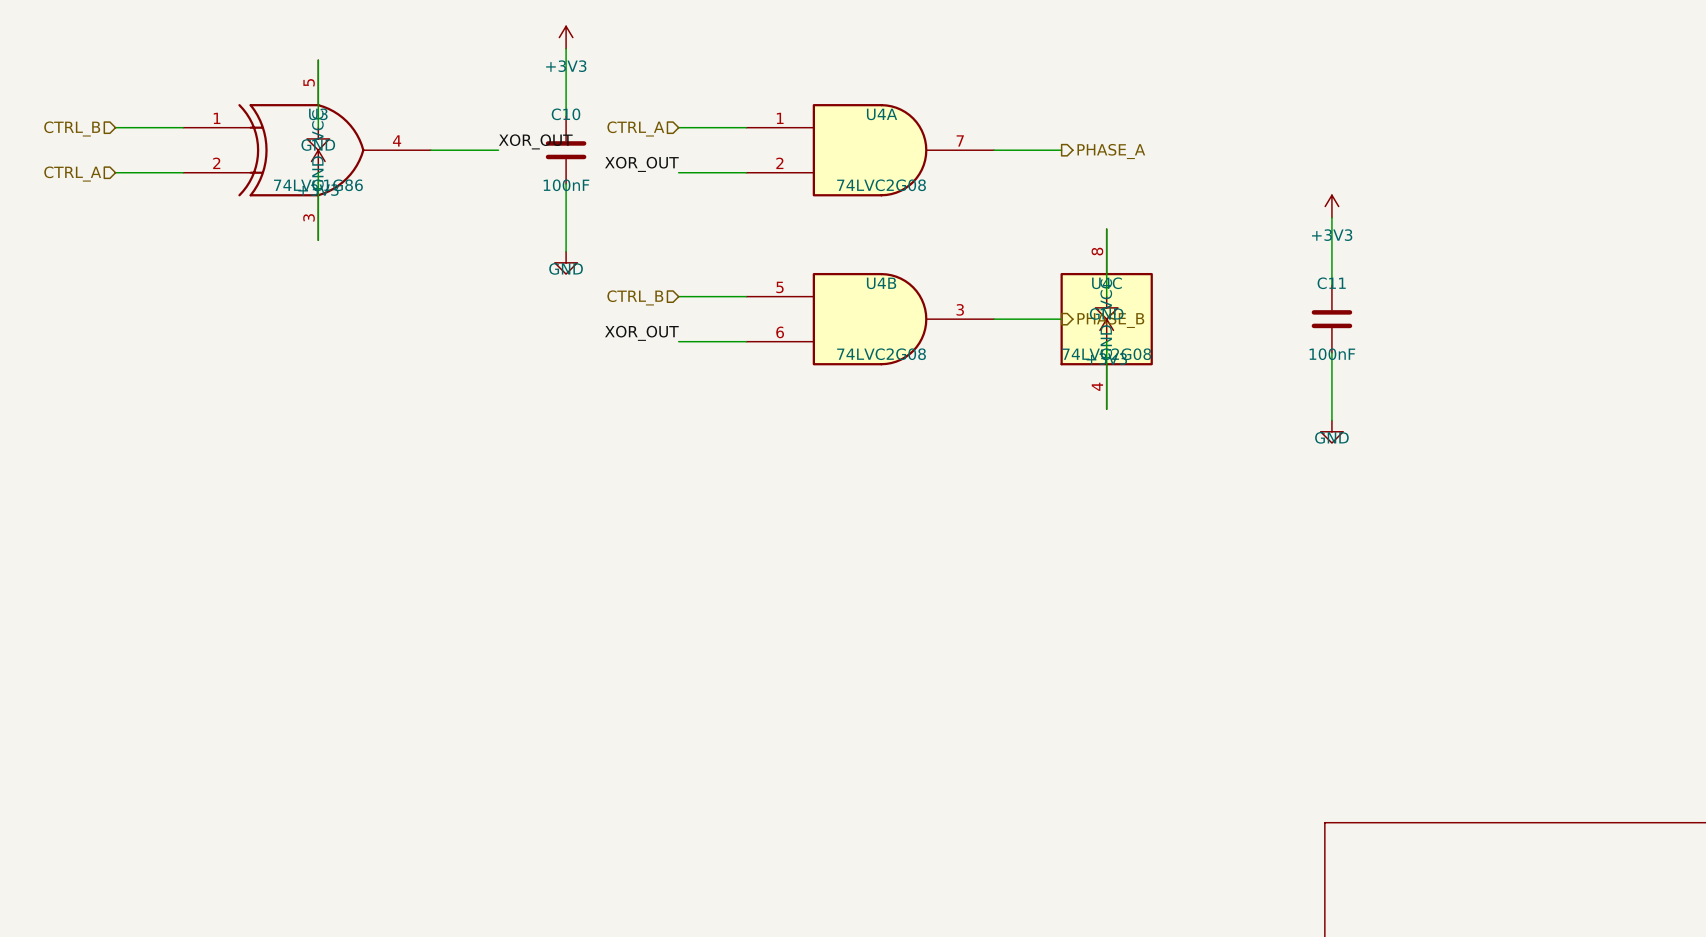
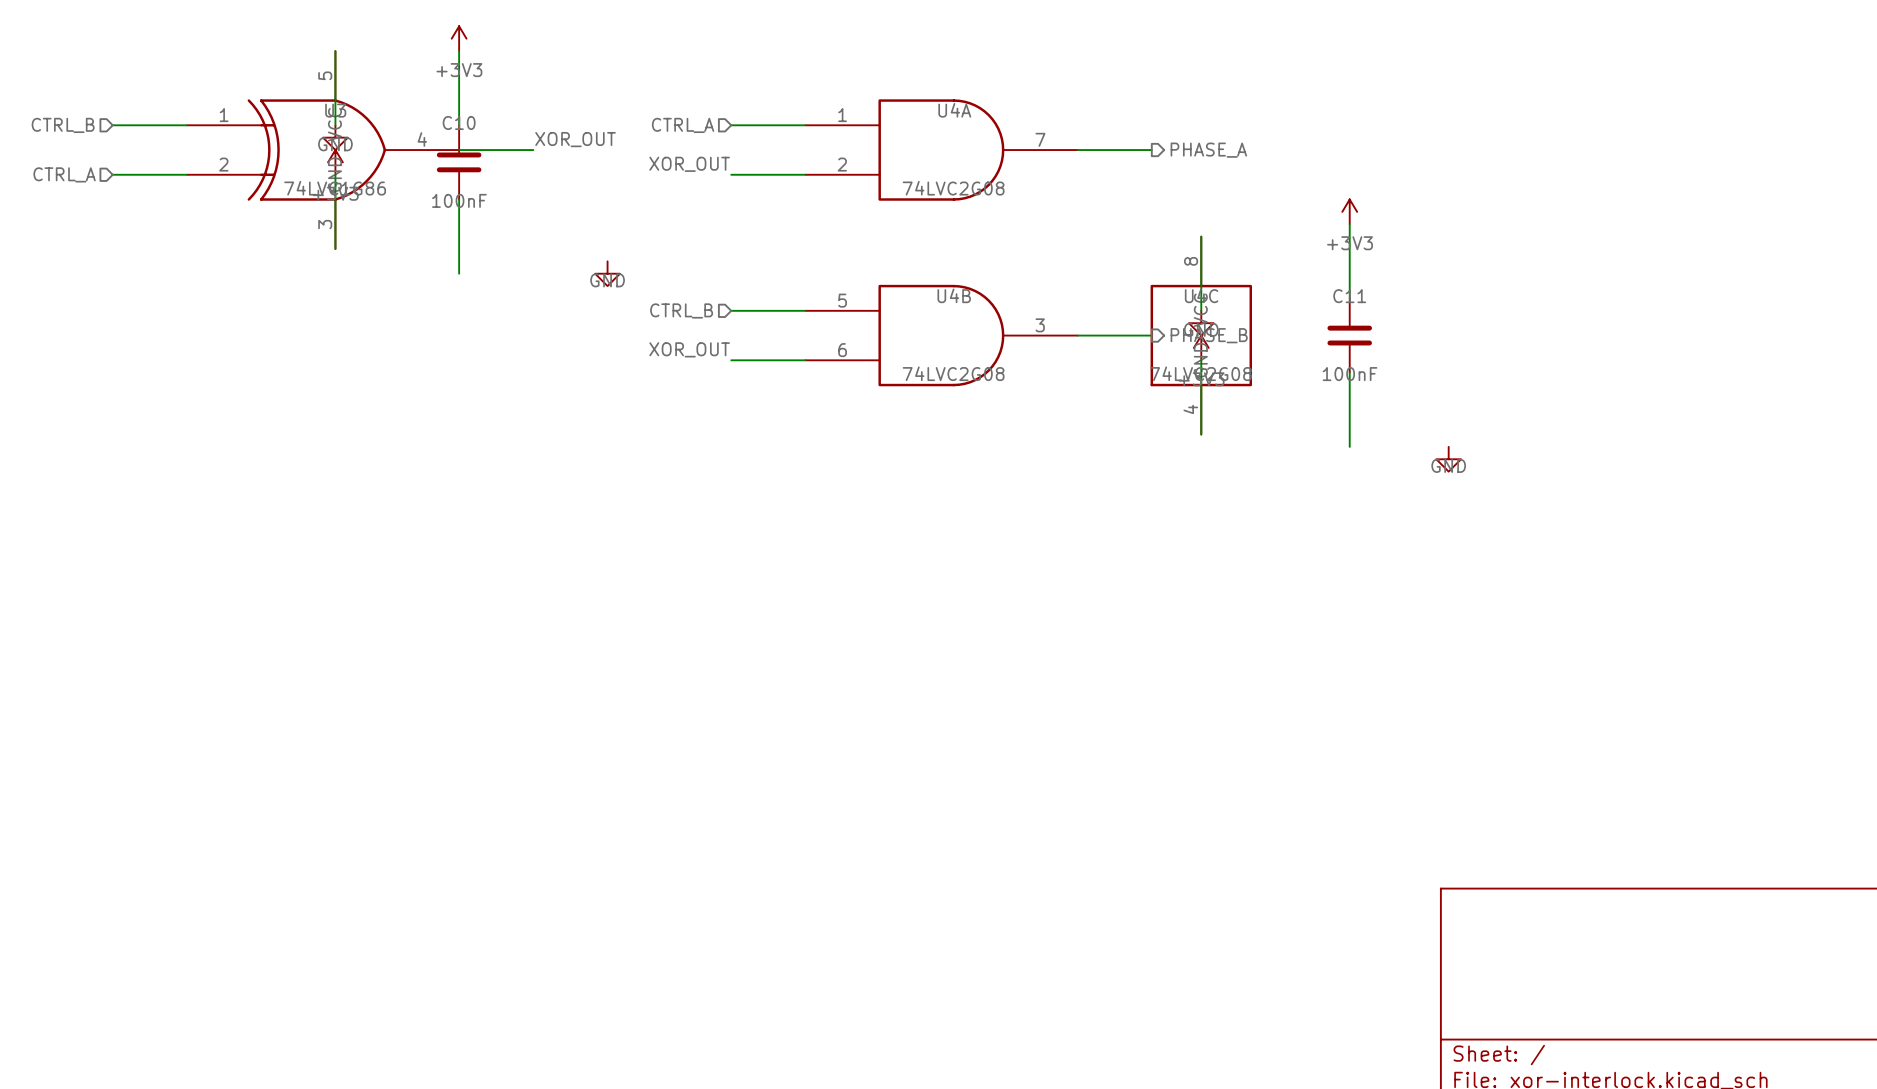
power symbol position: +3V3 (566, 37) -> +3V3 (459, 38)
wire: (566, 48) (566, 116) -> (459, 51) (459, 125)
C10 position: (566, 150) -> (459, 162)
wire: (566, 184) (566, 251) -> (459, 199) (459, 273)
power symbol position: +3V3 (1331, 206) -> +3V3 (1349, 211)
wire: (1331, 217) (1331, 285) -> (1349, 224) (1349, 298)
C11 position: (1331, 319) -> (1349, 335)
wire: (1331, 352) (1331, 420) -> (1349, 372) (1349, 446)

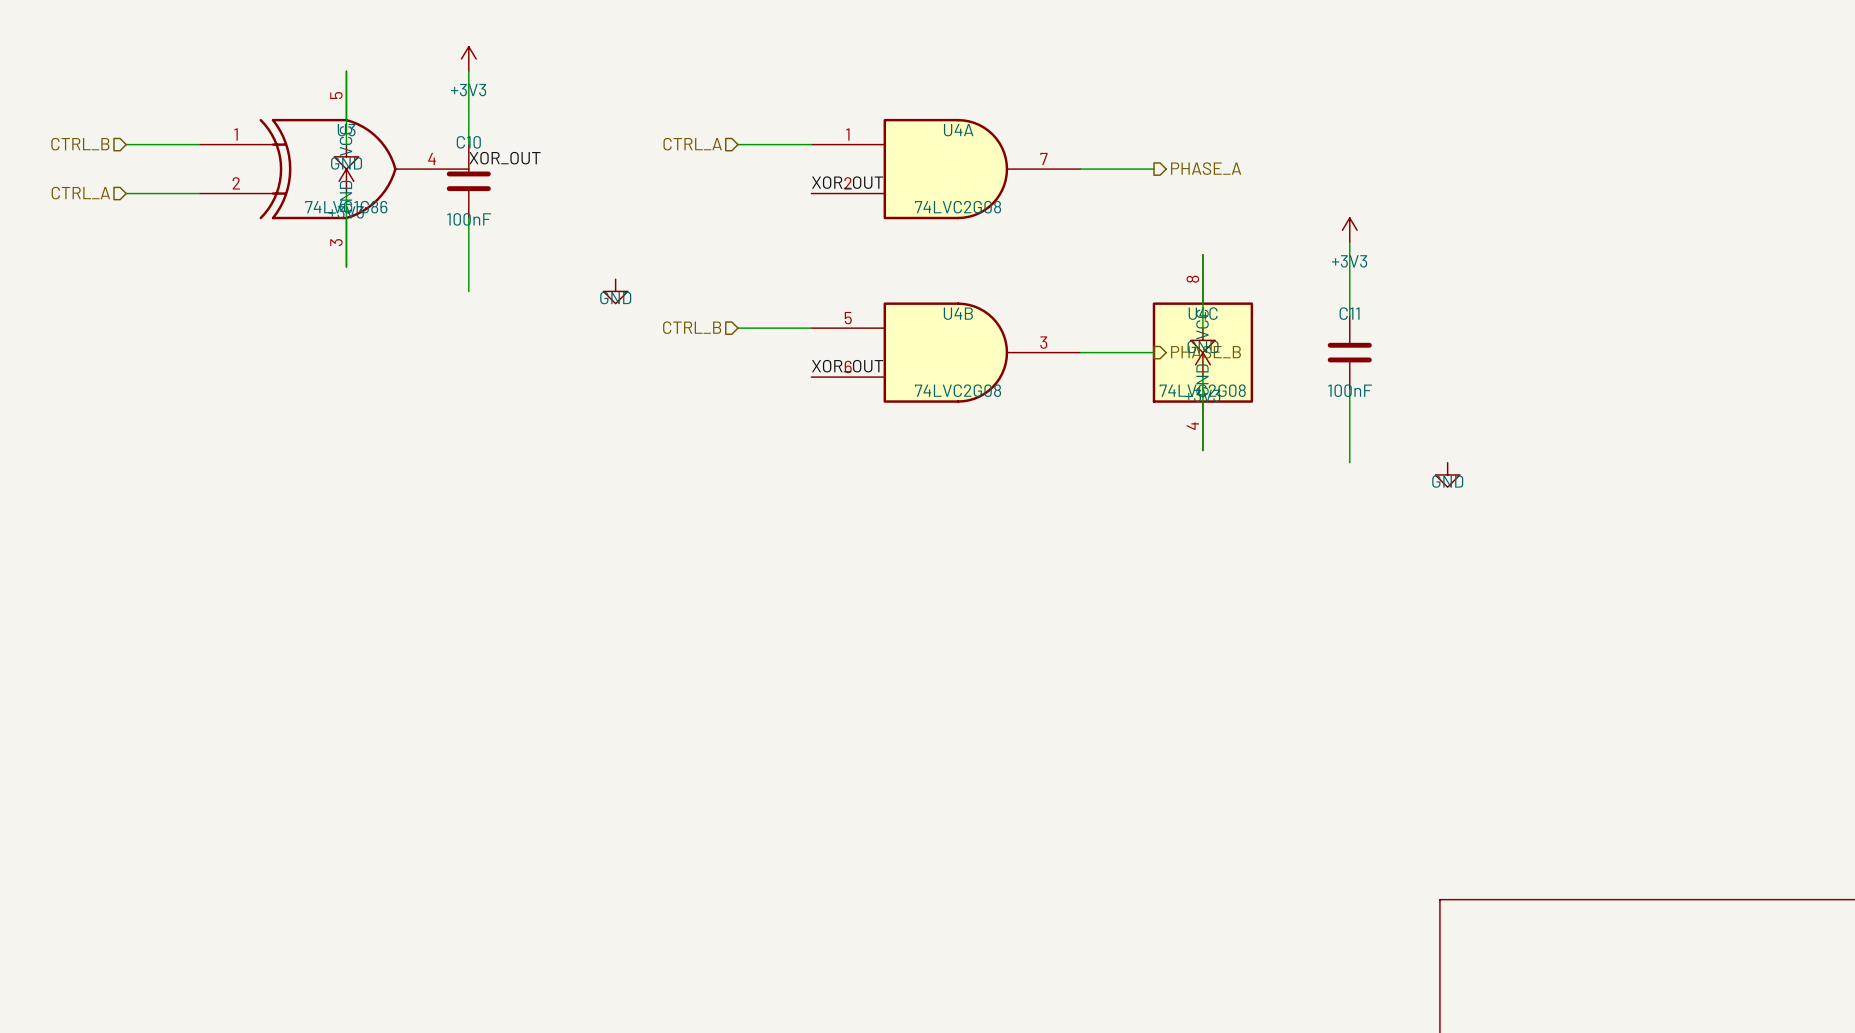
label position: XOR_OUT (575, 139) -> XOR_OUT (504, 158)
wire: (459, 150) (533, 150) -> none
label position: XOR_OUT (689, 164) -> XOR_OUT (847, 182)
wire: (731, 174) (805, 174) -> none
label position: XOR_OUT (689, 349) -> XOR_OUT (847, 366)
wire: (731, 360) (805, 360) -> none

